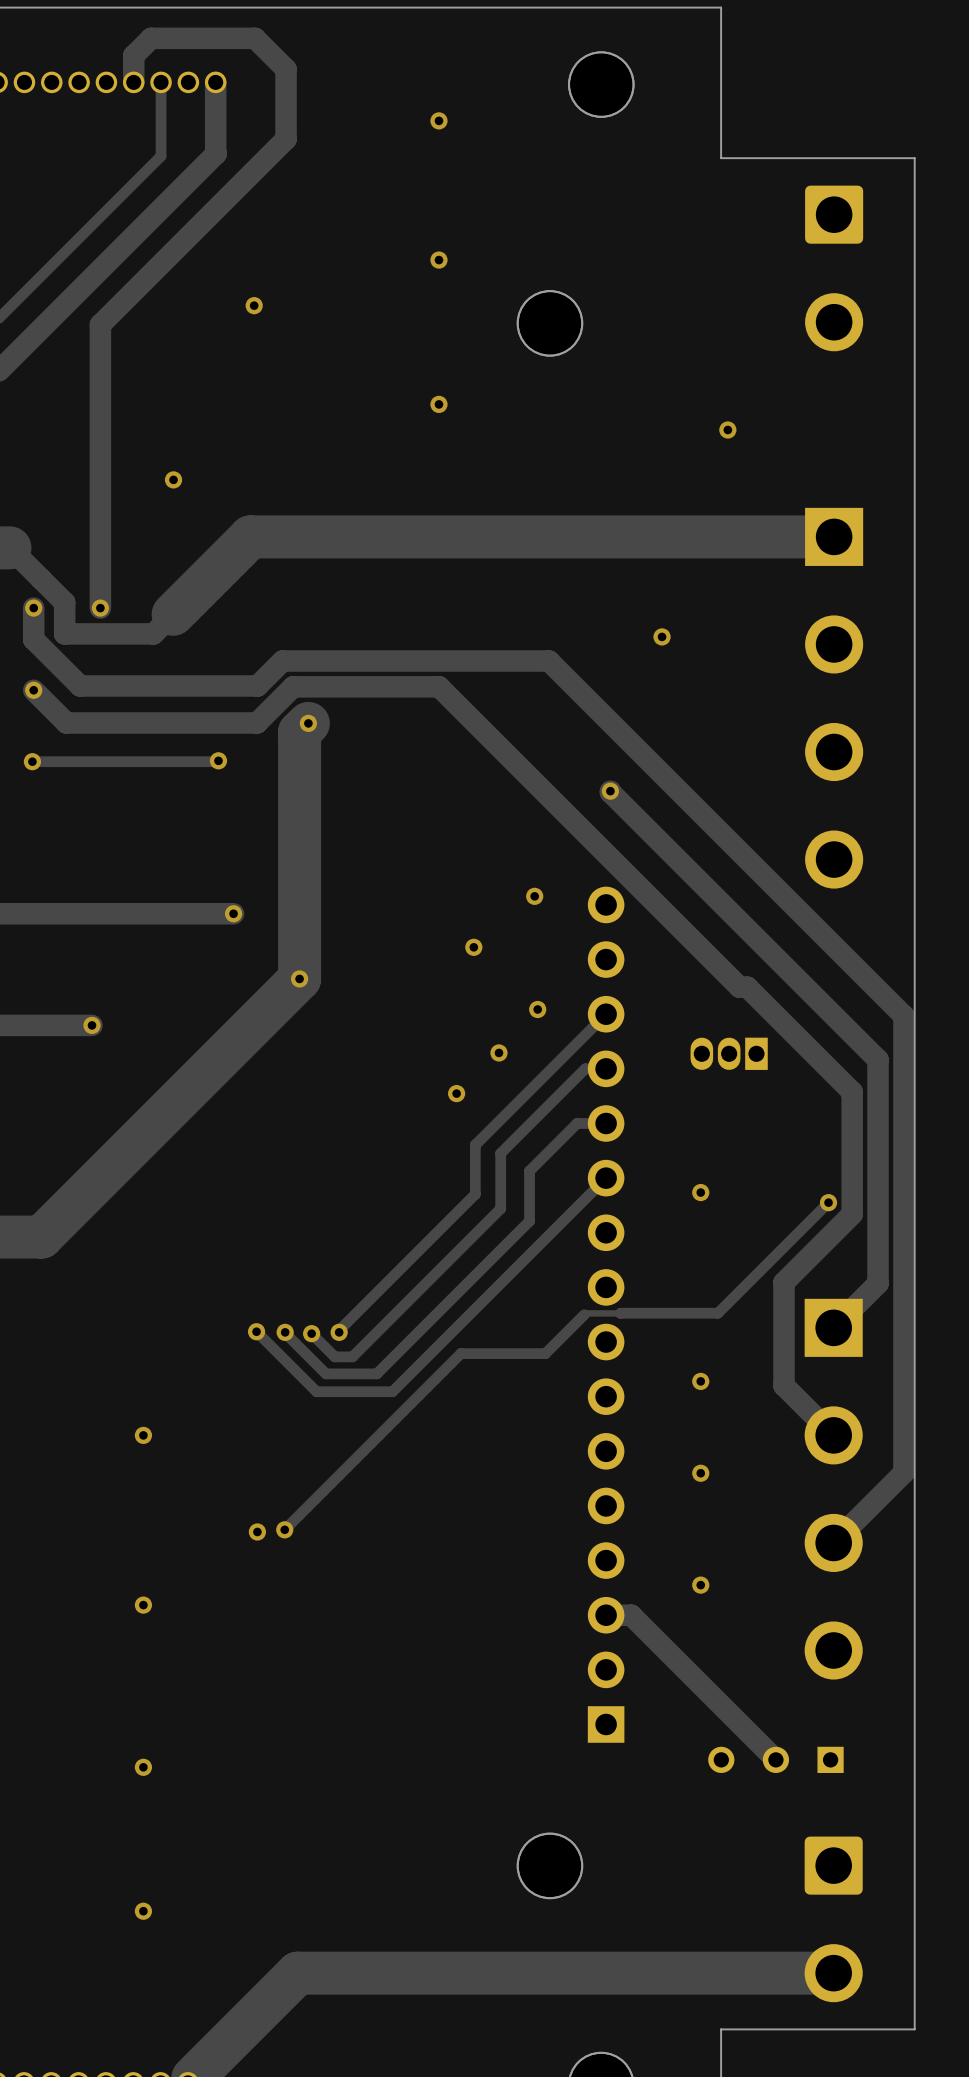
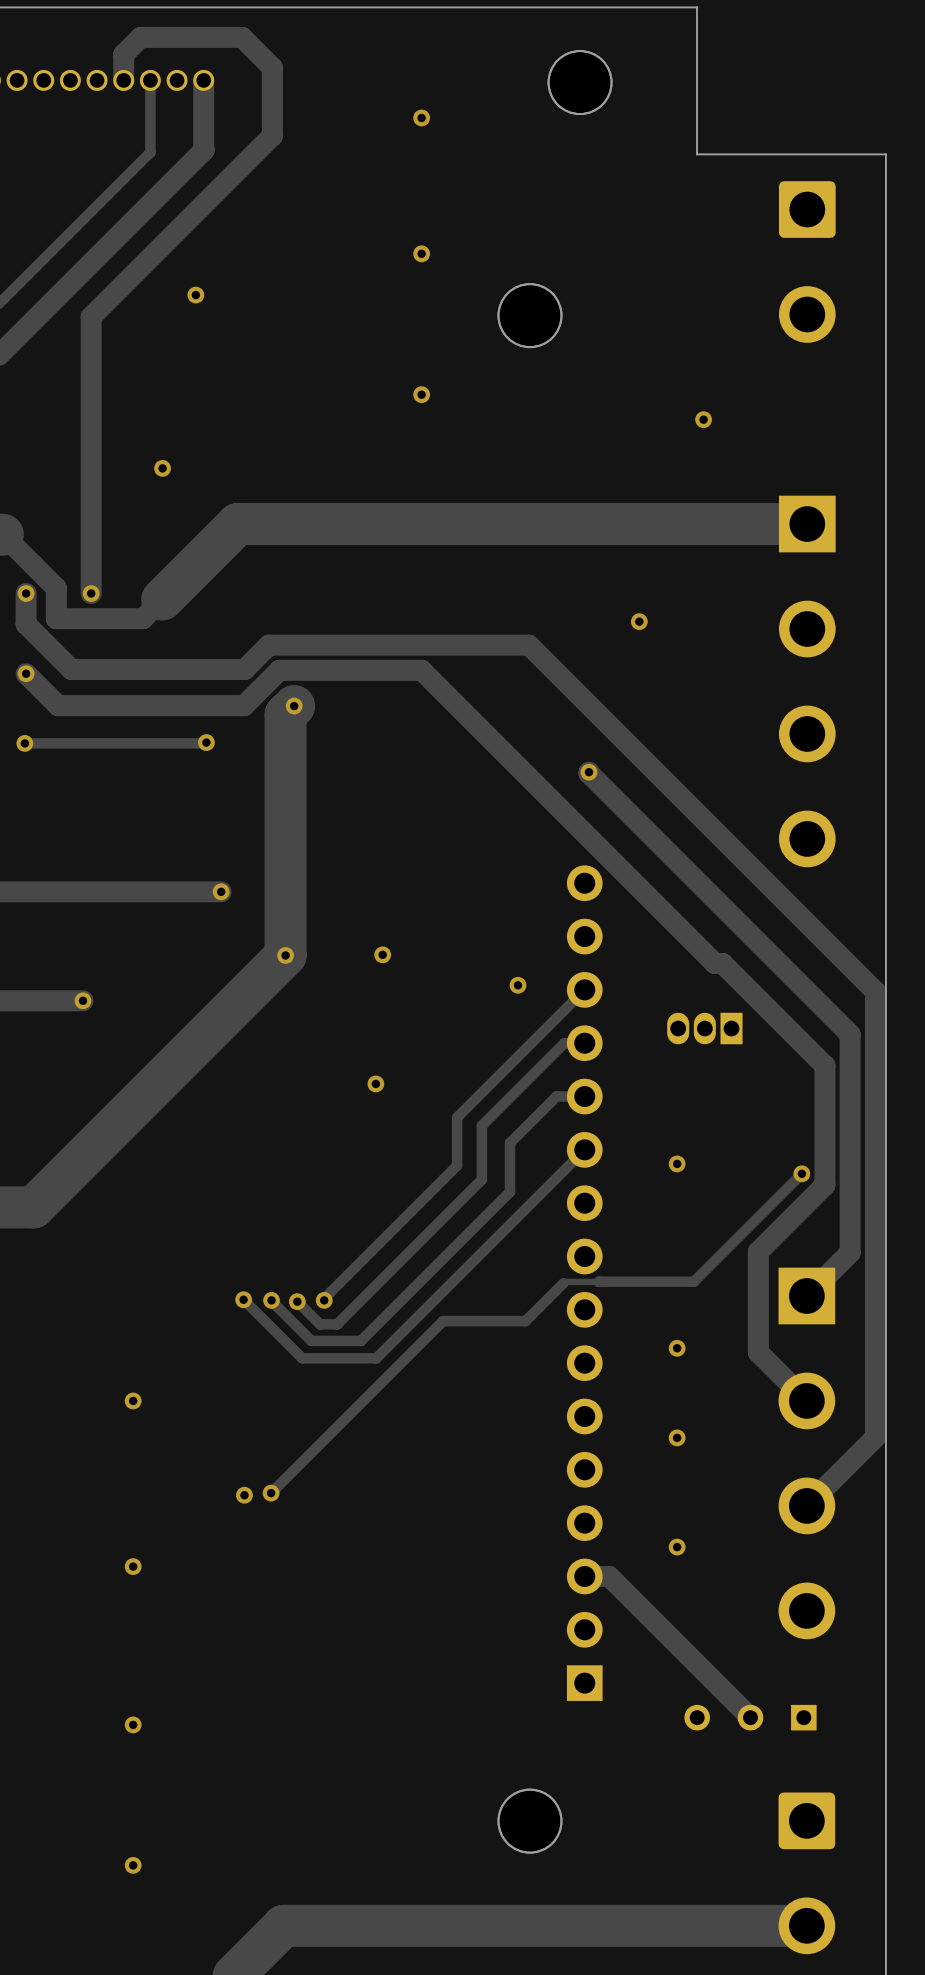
via position: (254, 305) -> (195, 295)
via: (534, 896) -> none
via: (473, 947) -> none
via: none -> (382, 954)
via: (498, 1052) -> none
via: (456, 1093) -> none
via: none -> (375, 1083)

